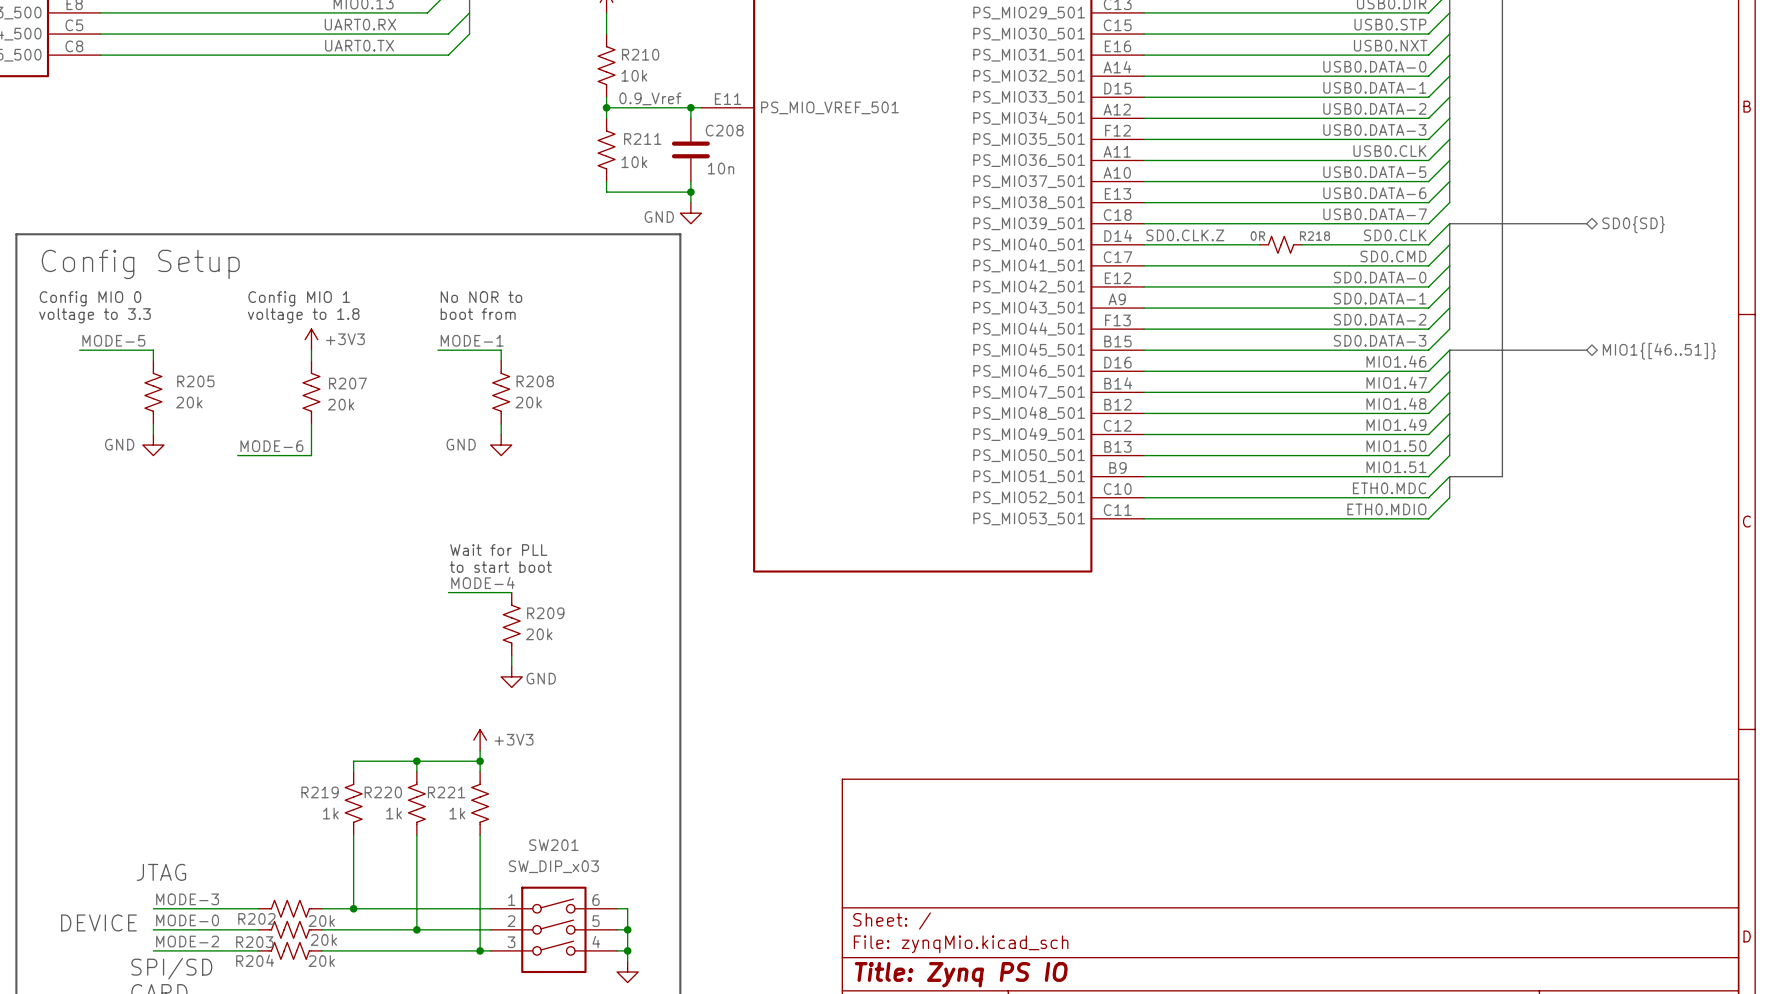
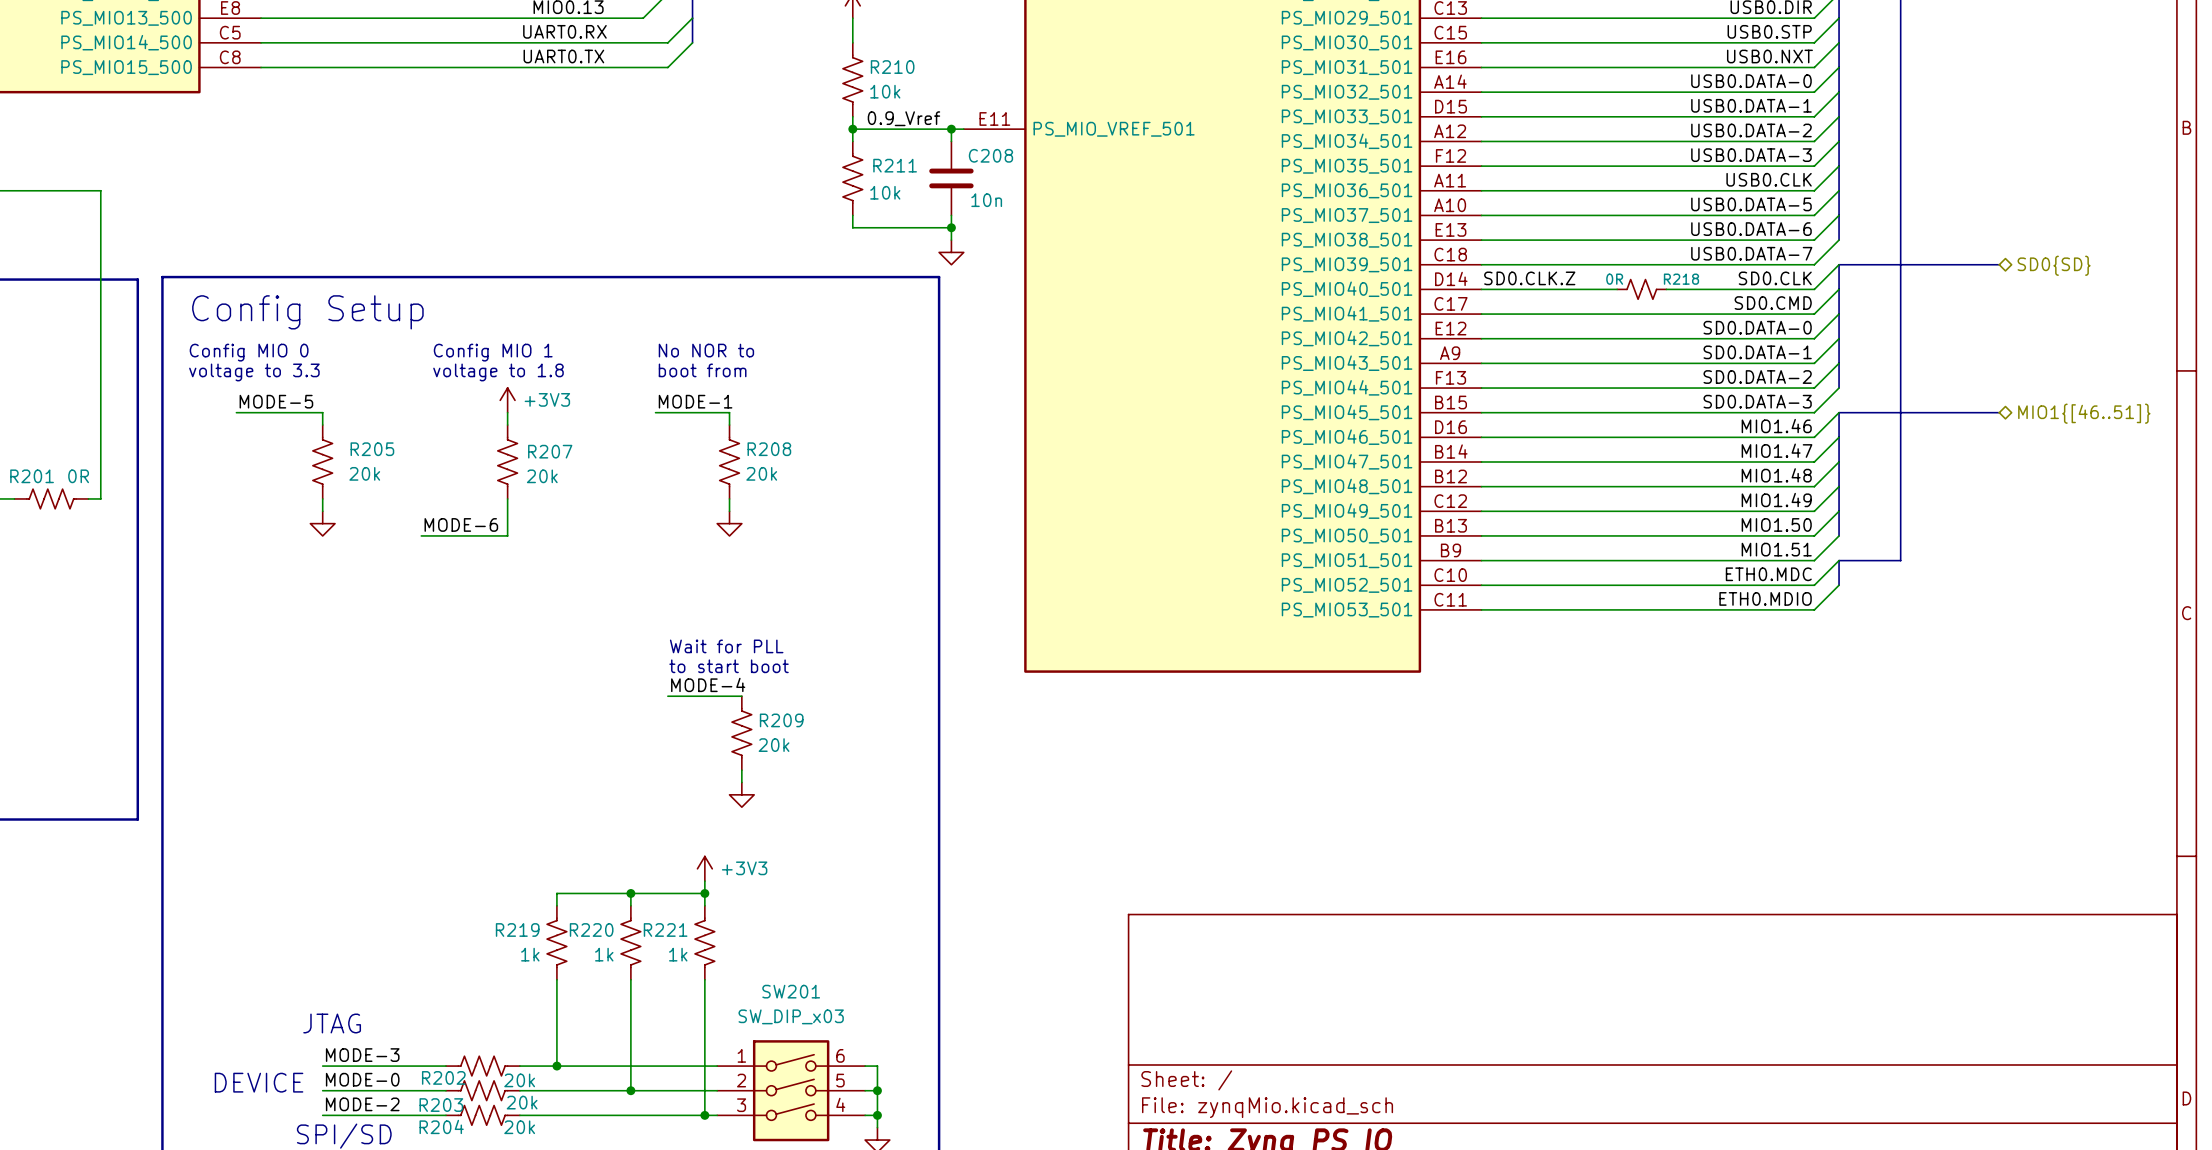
power symbol text: GND (659, 217) -> none
power symbol text: GND (119, 444) -> none
power symbol text: GND (461, 444) -> none
power symbol text: GND (541, 678) -> none

